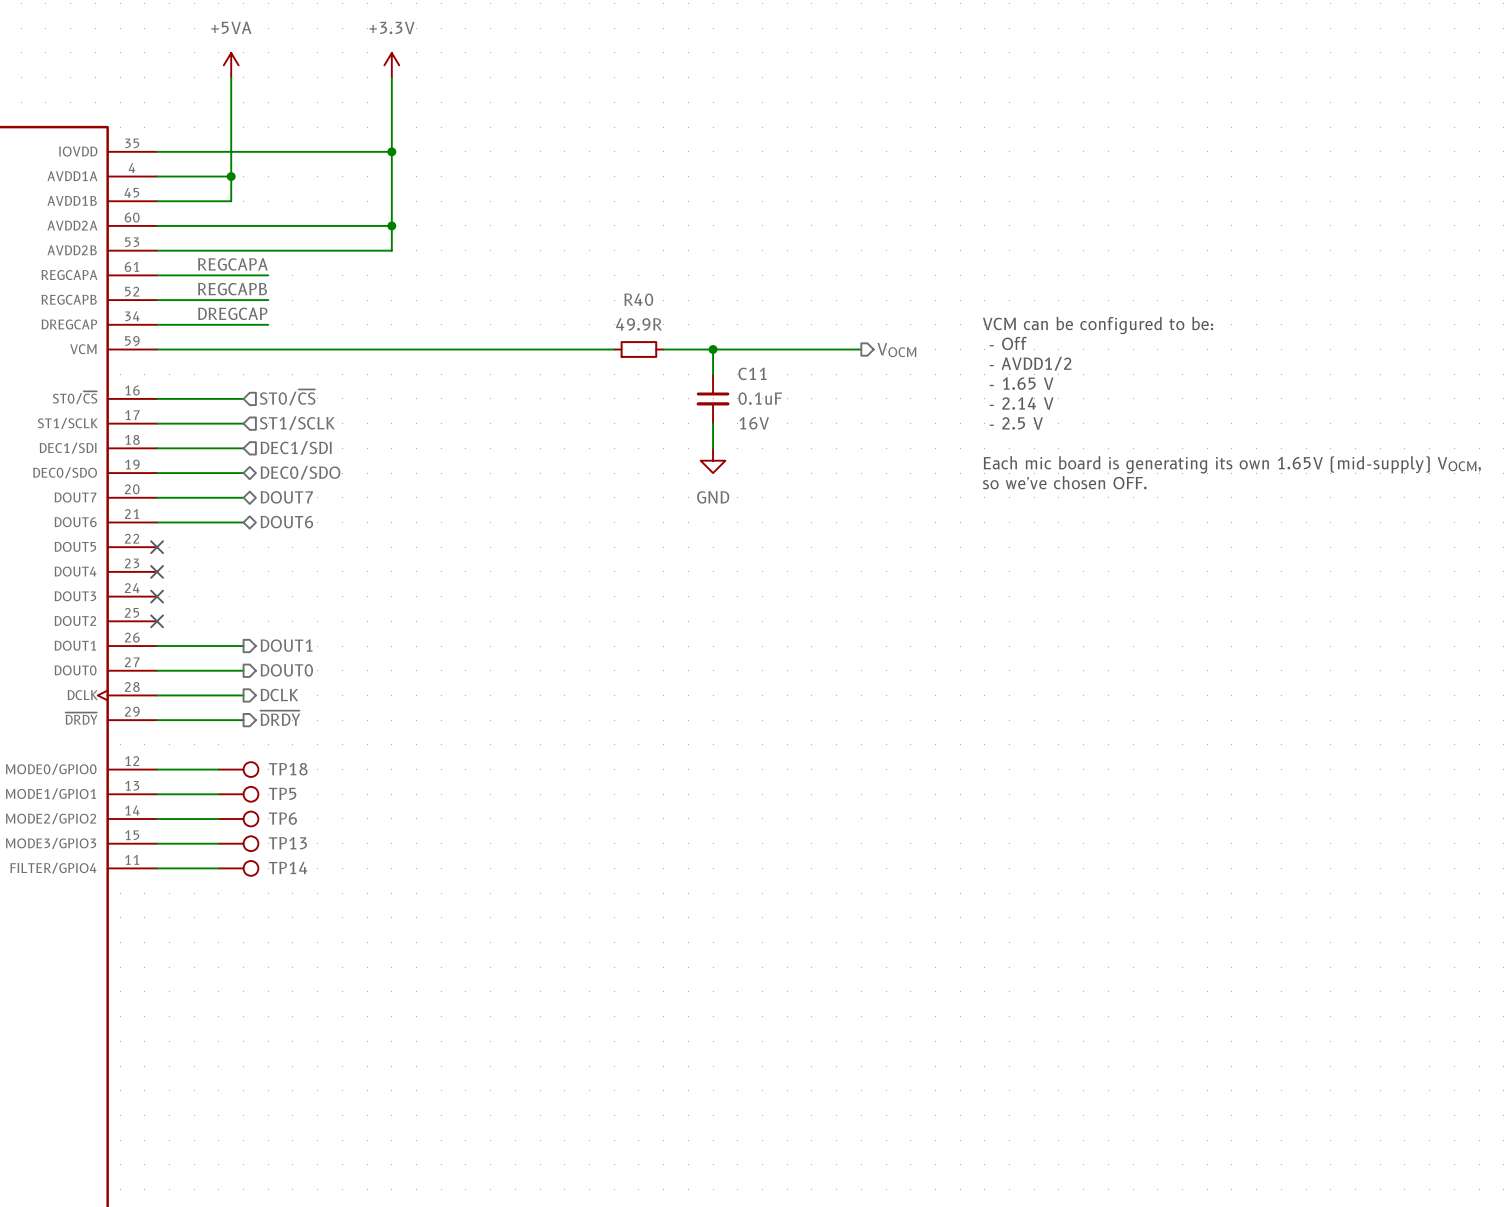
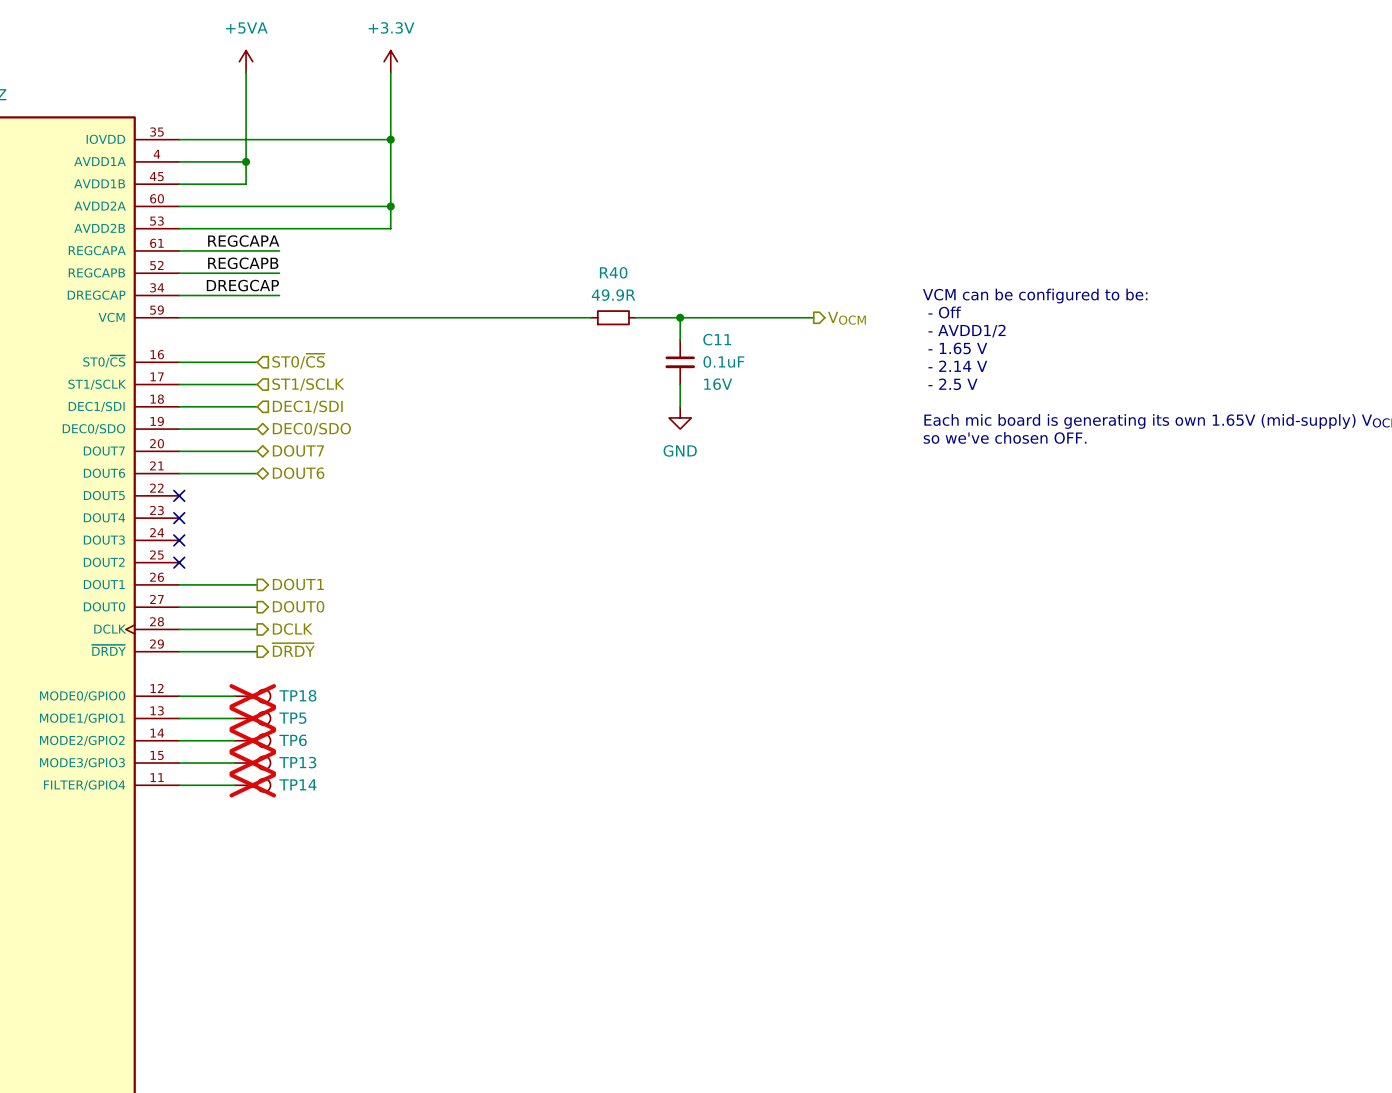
TP18 do-not-place cross: none -> (252, 696)
TP5 do-not-place cross: none -> (252, 718)
TP6 do-not-place cross: none -> (252, 740)
TP13 do-not-place cross: none -> (252, 763)
TP14 do-not-place cross: none -> (252, 785)

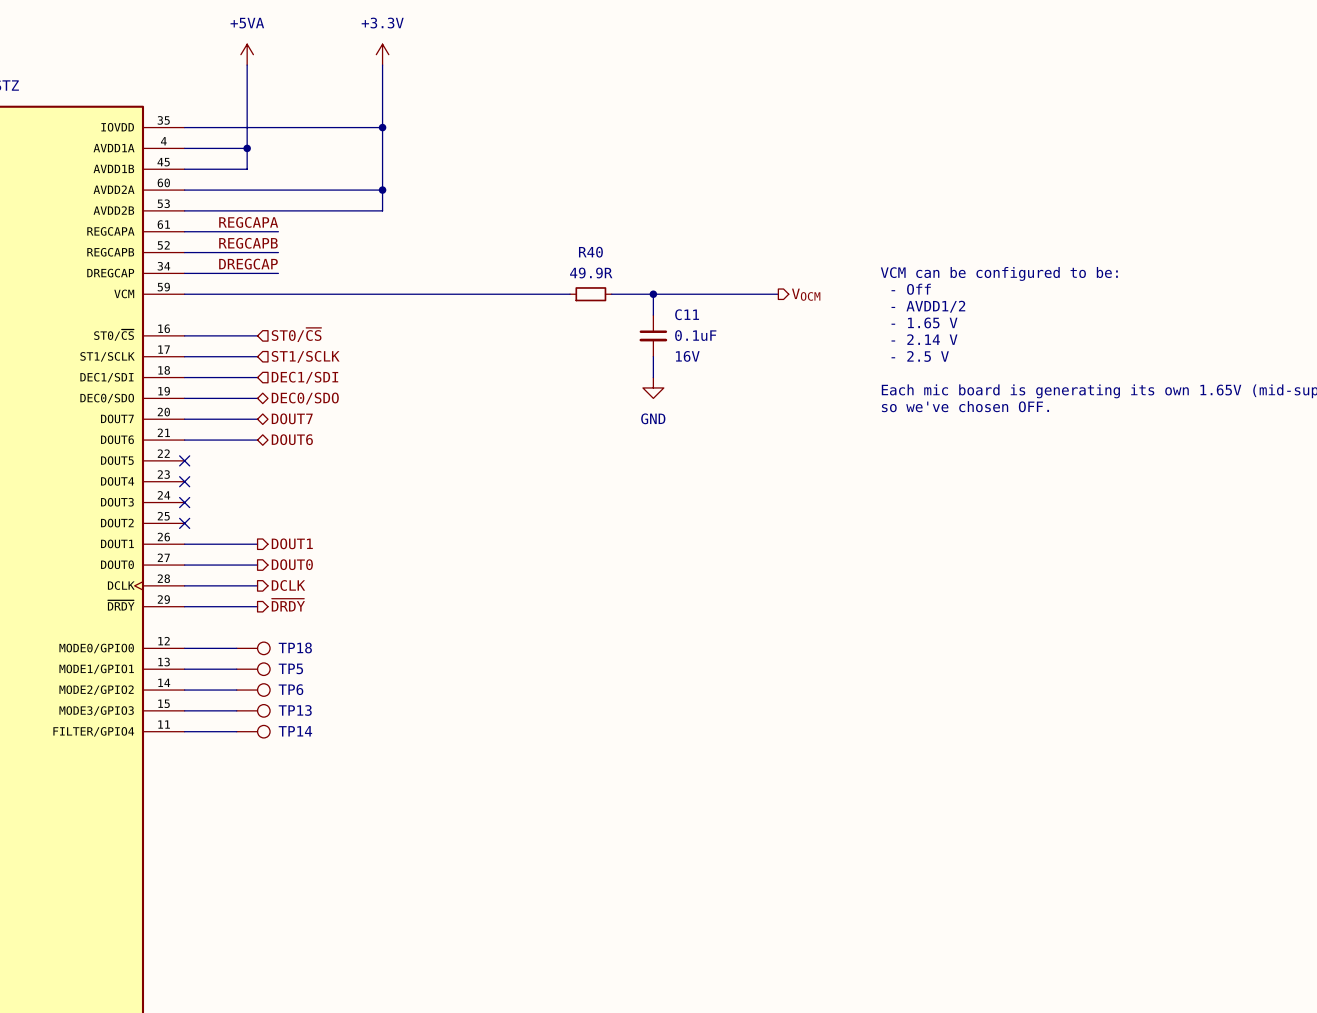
TP18 do-not-place cross: (252, 696) -> none
TP5 do-not-place cross: (252, 718) -> none
TP6 do-not-place cross: (252, 740) -> none
TP13 do-not-place cross: (252, 763) -> none
TP14 do-not-place cross: (252, 785) -> none

